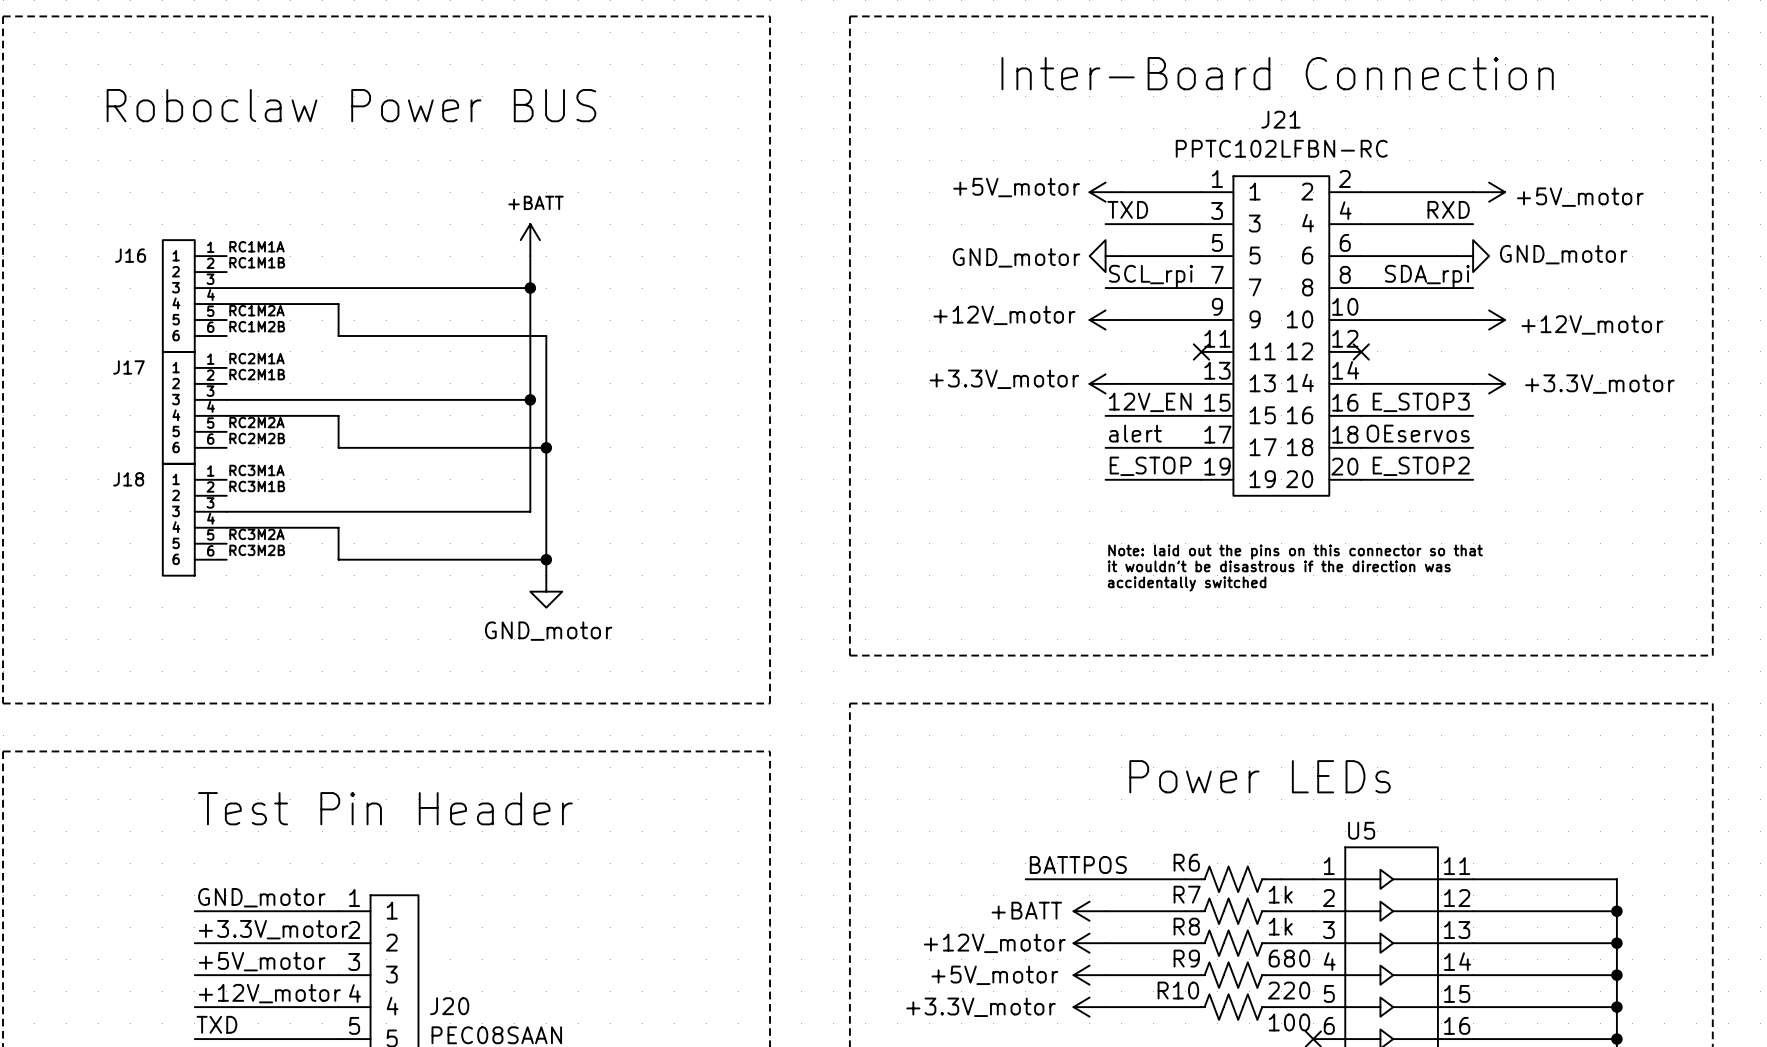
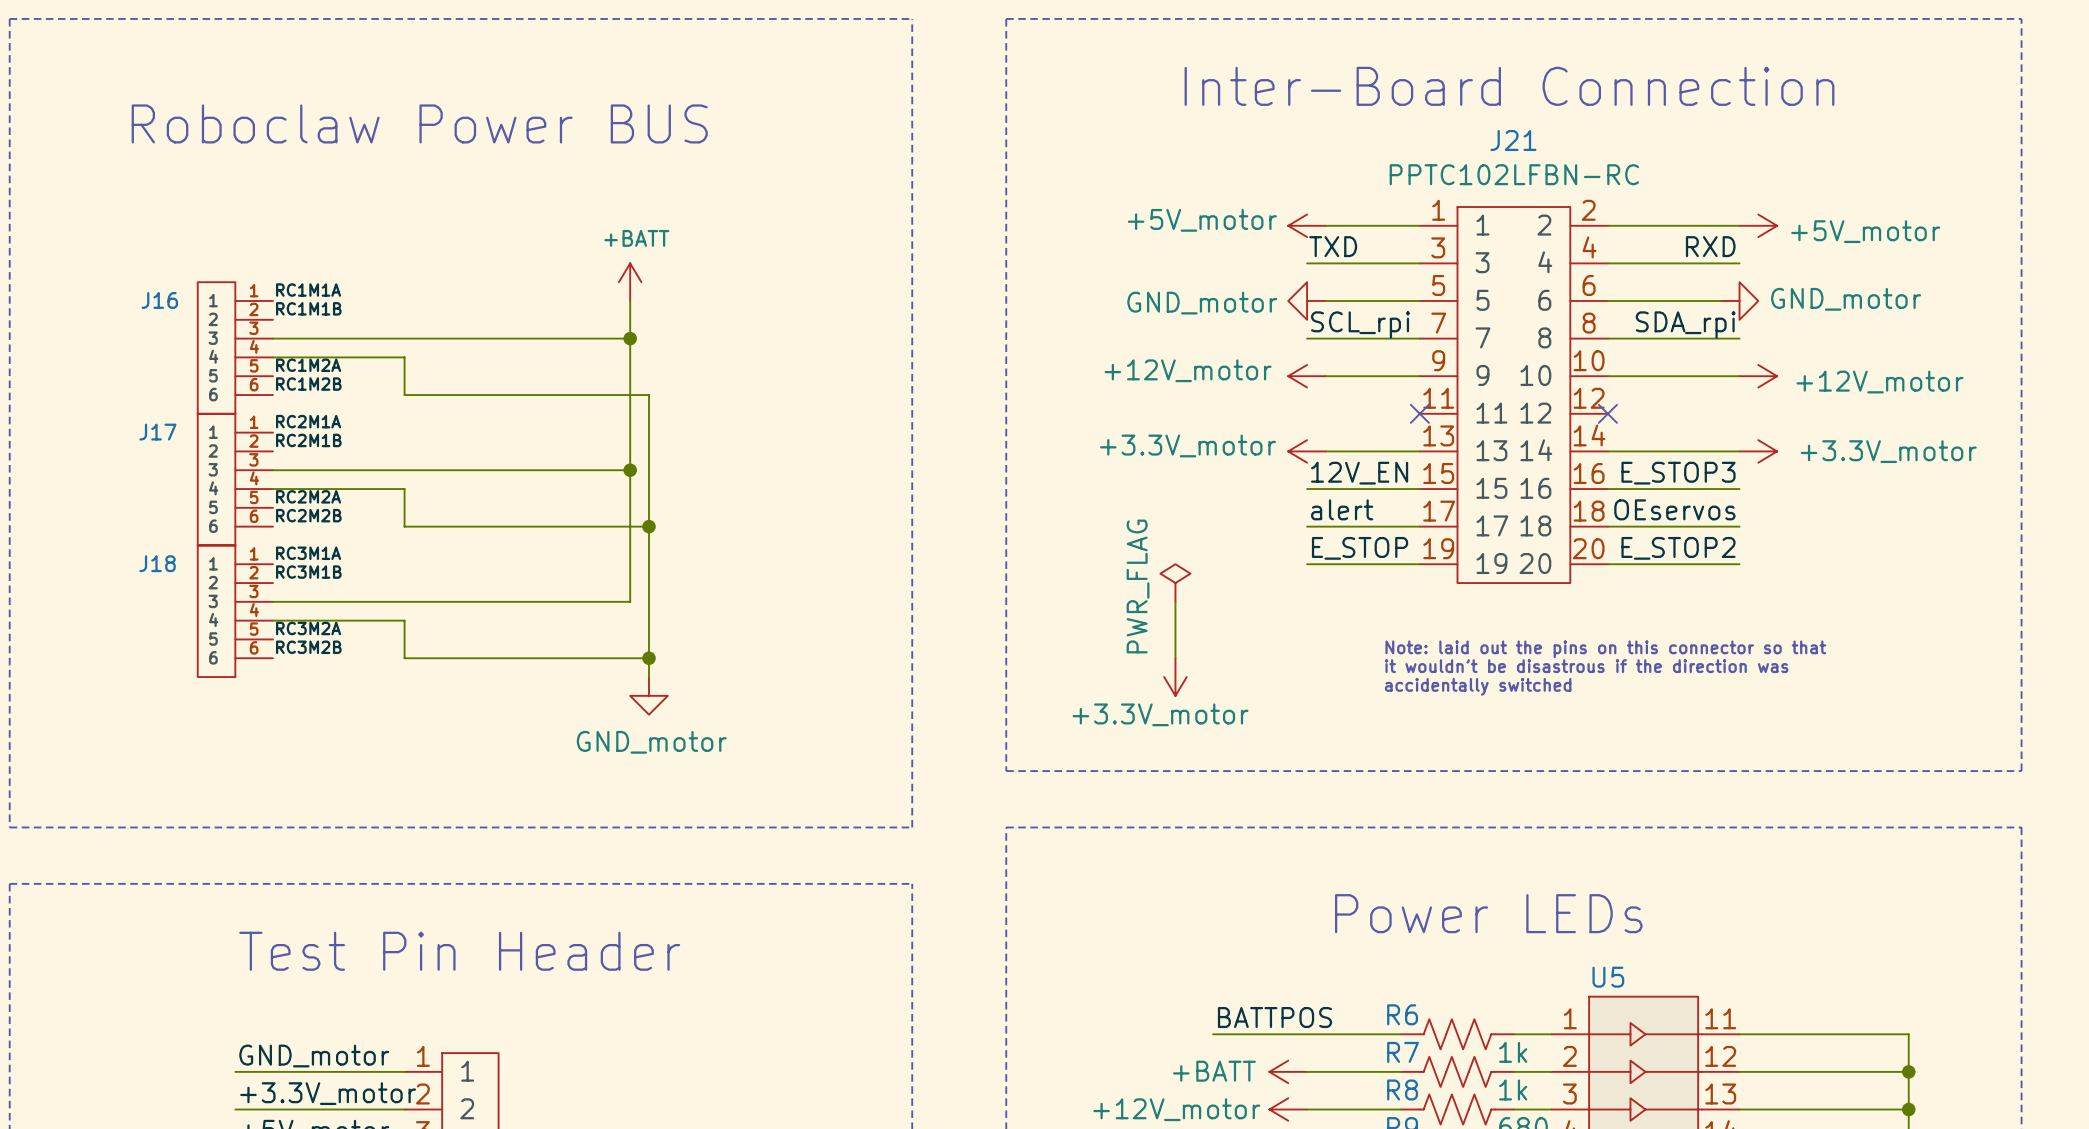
power symbol: none -> PWR_FLAG (1175, 583)
wire: none -> (1175, 601) (1175, 658)
text position: Note: laid out the pins on this connector so that (1295, 552) -> Note: laid out the pins on this connector so that (1605, 649)
text position: it wouldn’t be disastrous if the direction was (1279, 566) -> it wouldn’t be disastrous if the direction was (1586, 666)
power symbol: none -> +3.3V_motor (1175, 677)
text position: accidentally switched (1187, 583) -> accidentally switched (1478, 686)

